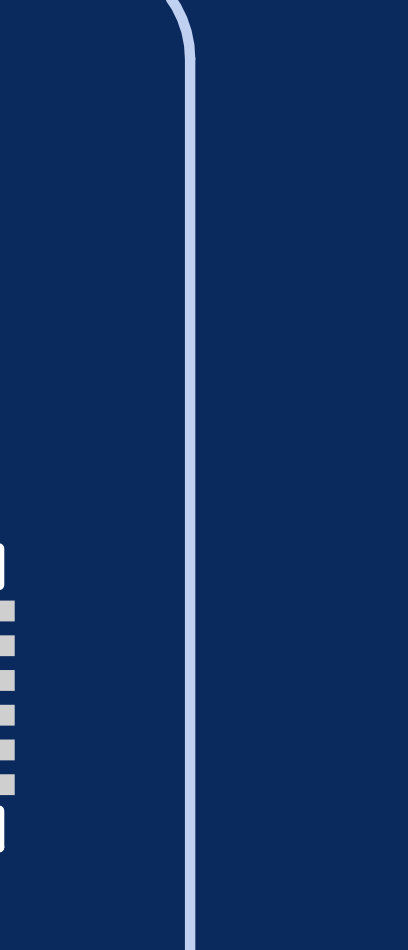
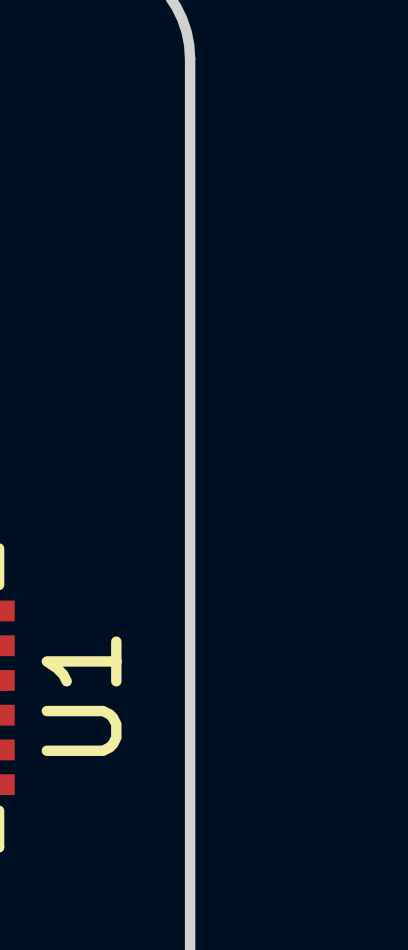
U1 name: none -> U1 (81, 696)

